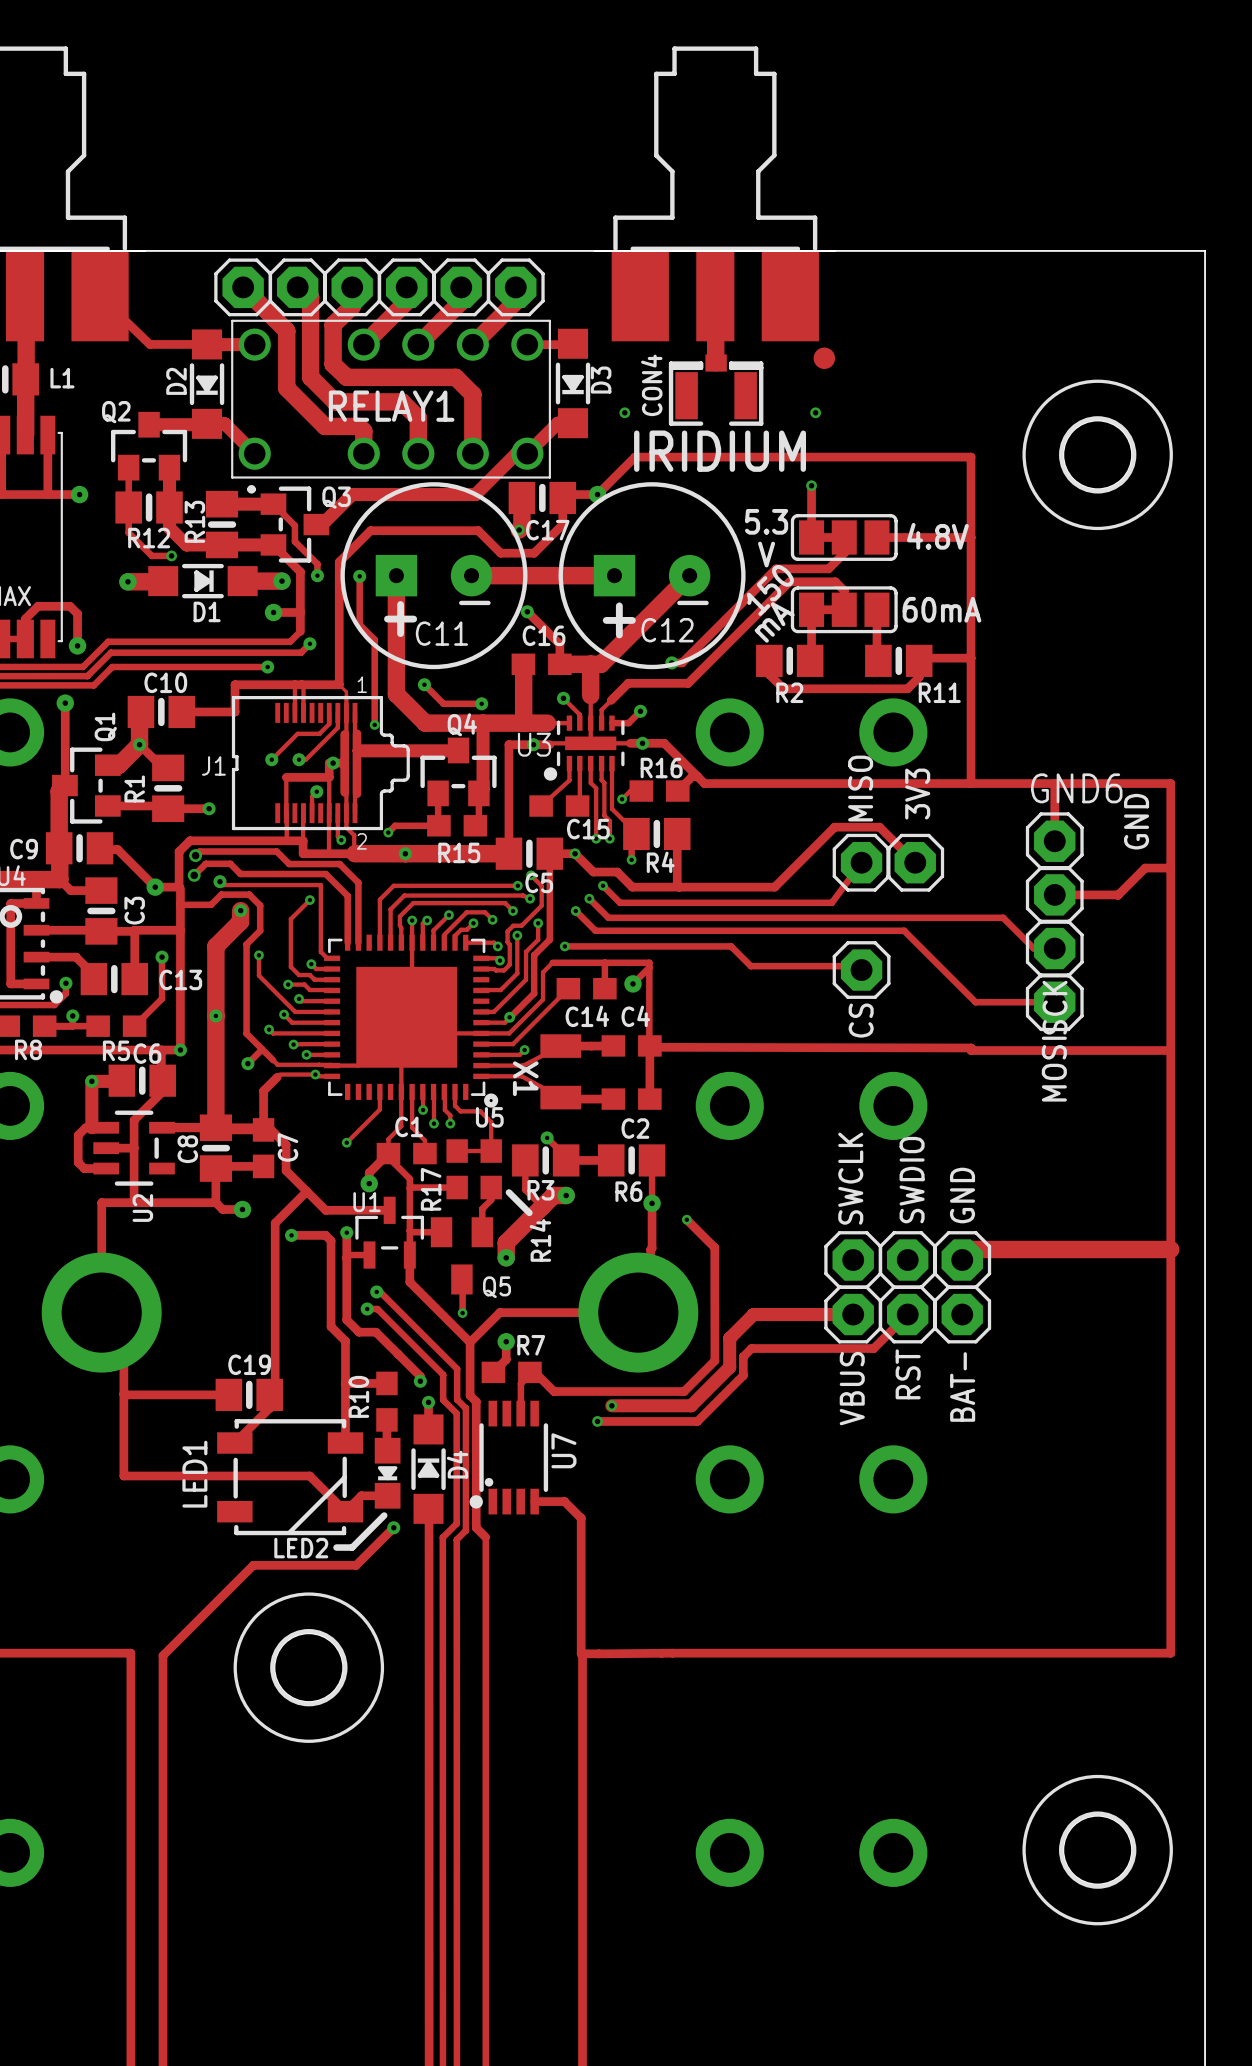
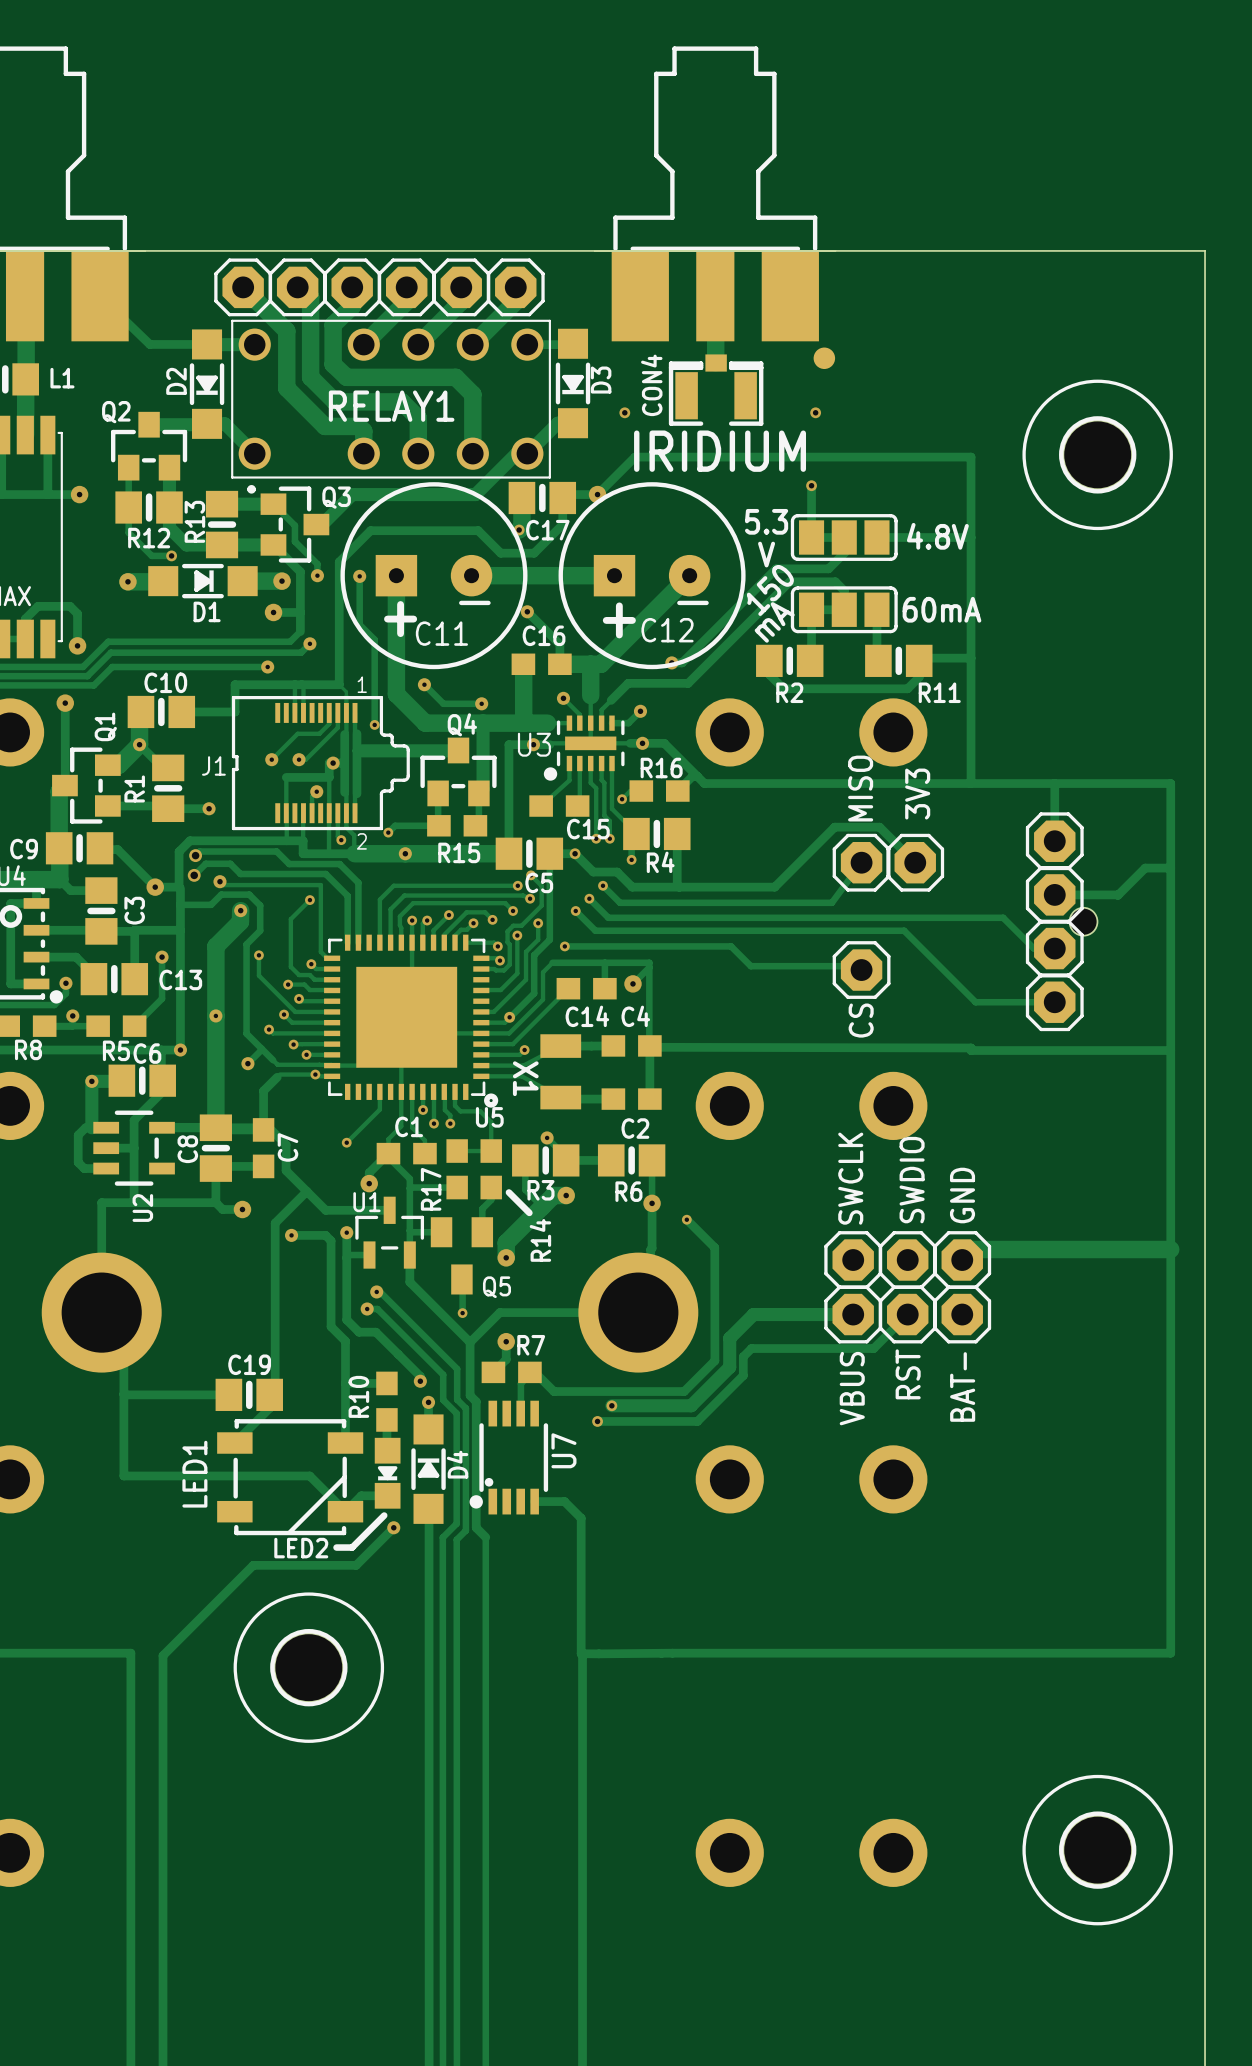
GND6 name: GND6 (1076, 788) -> none
text: GND (1136, 821) -> none
hole: none -> (1083, 921)
SCK name: SCK (1055, 1007) -> none
MOSI name: MOSI (1054, 1069) -> none

